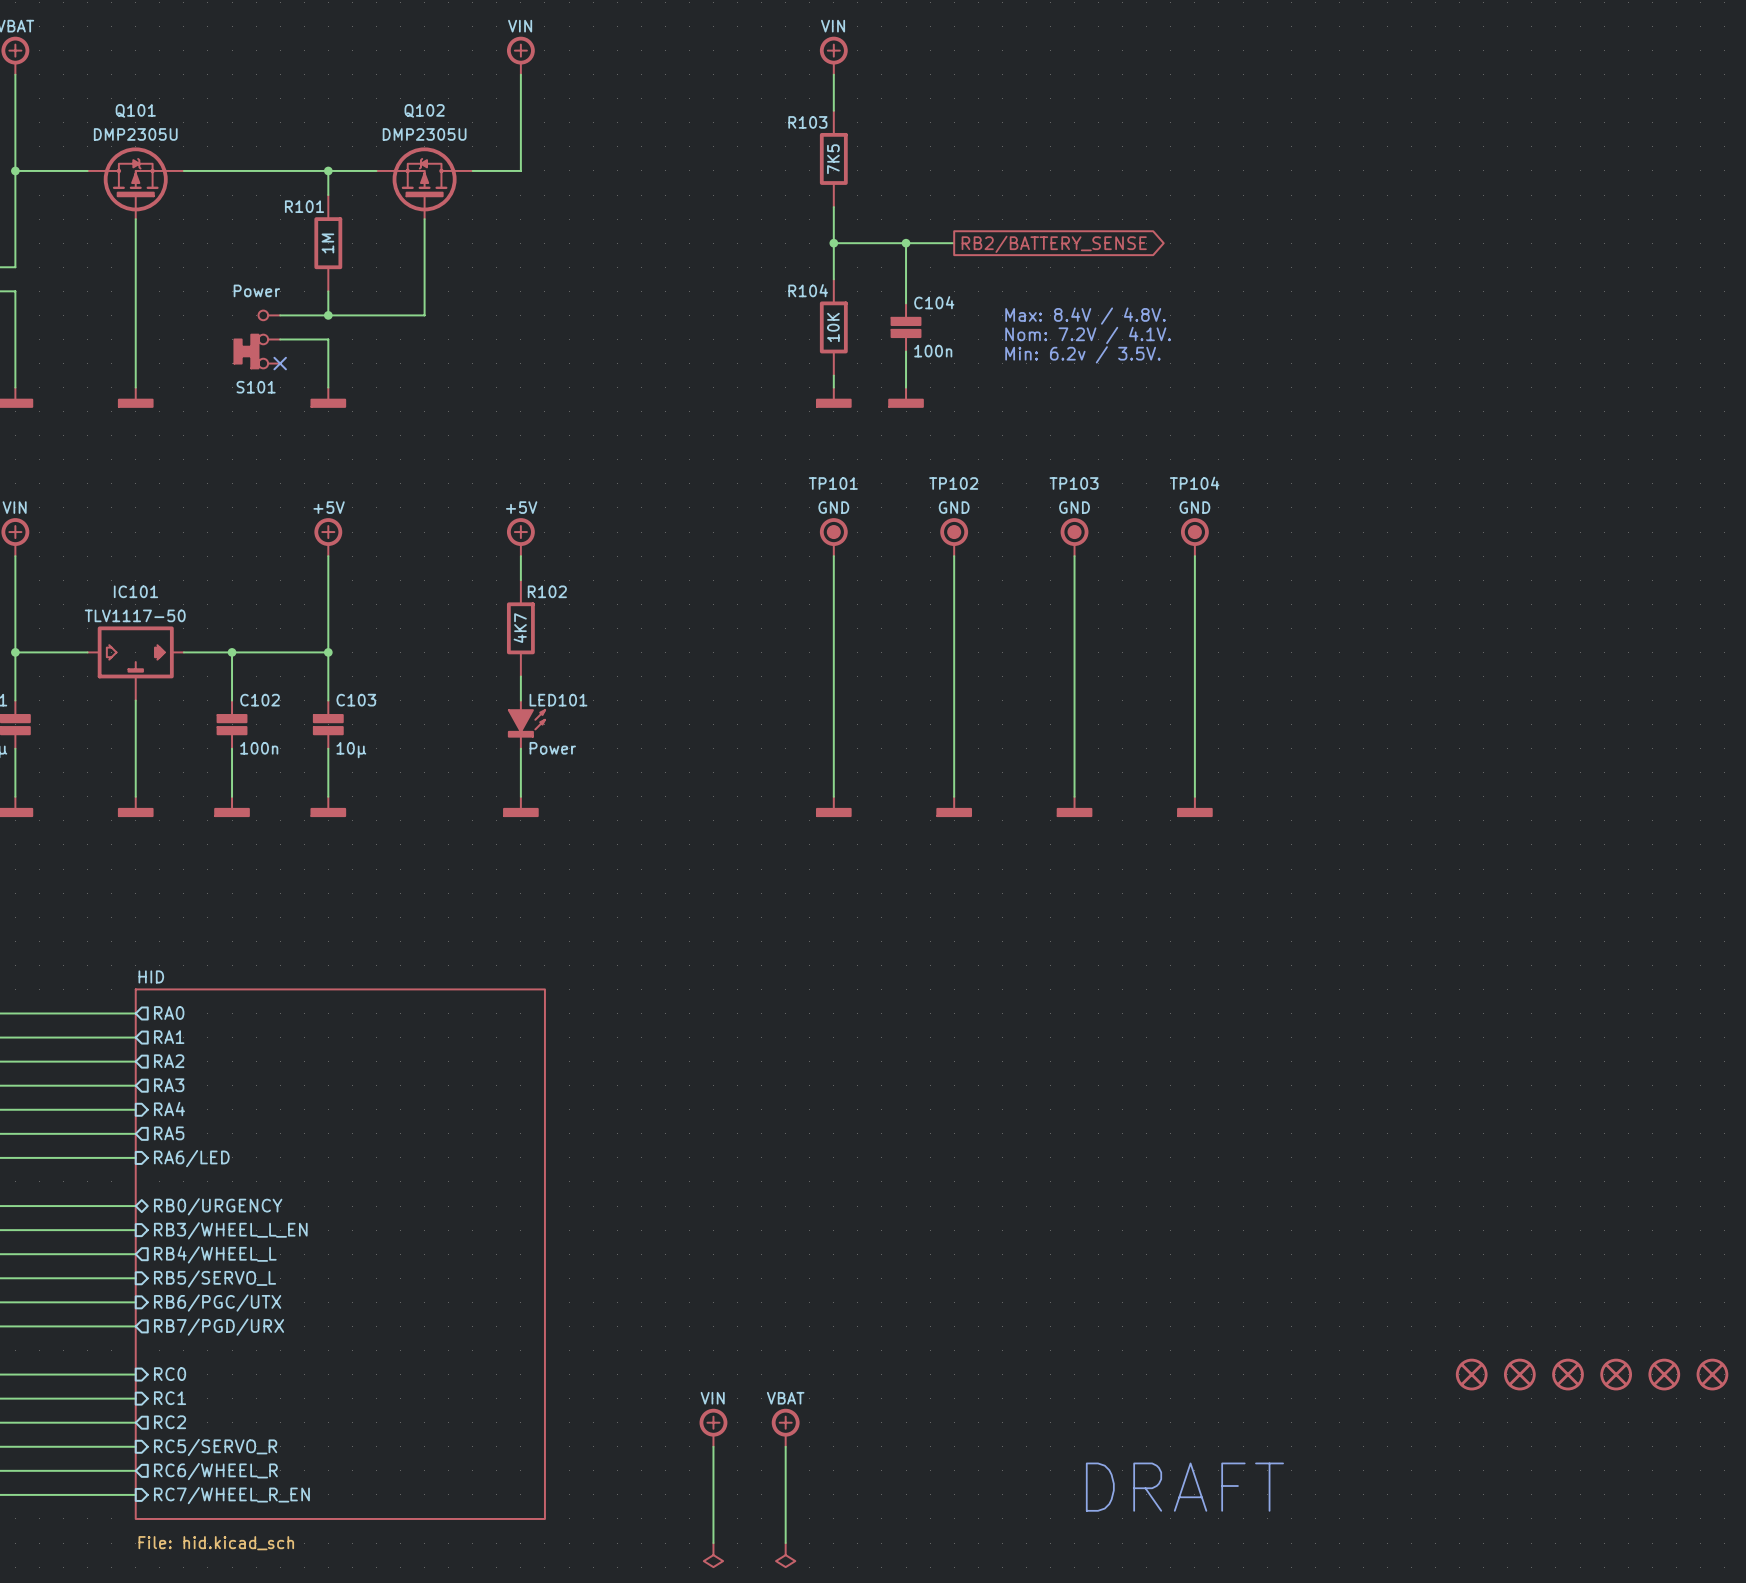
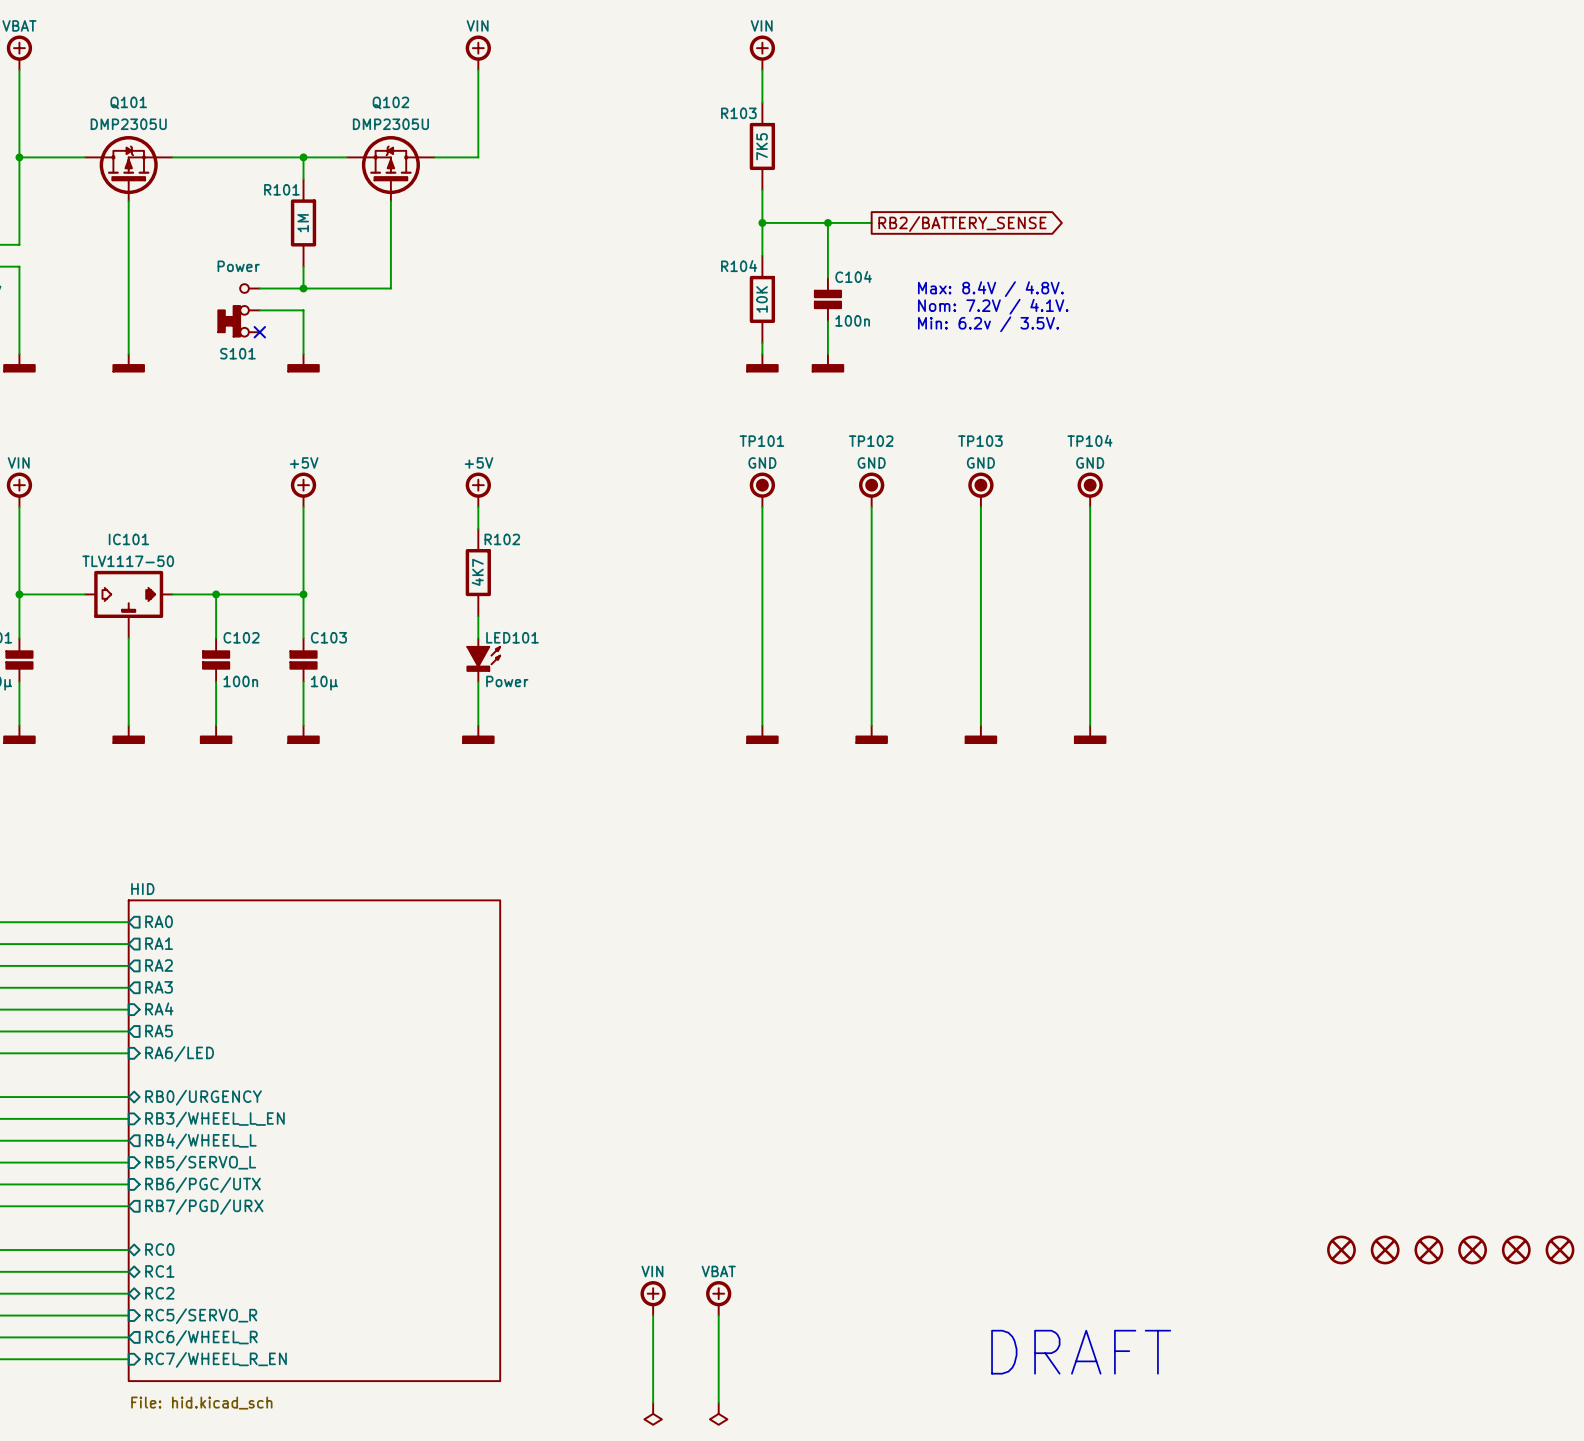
sheet pin shape: input (170, 1374) -> bidirectional (159, 1249)
sheet pin shape: input (170, 1398) -> bidirectional (159, 1271)
sheet pin shape: output (170, 1422) -> bidirectional (159, 1293)

